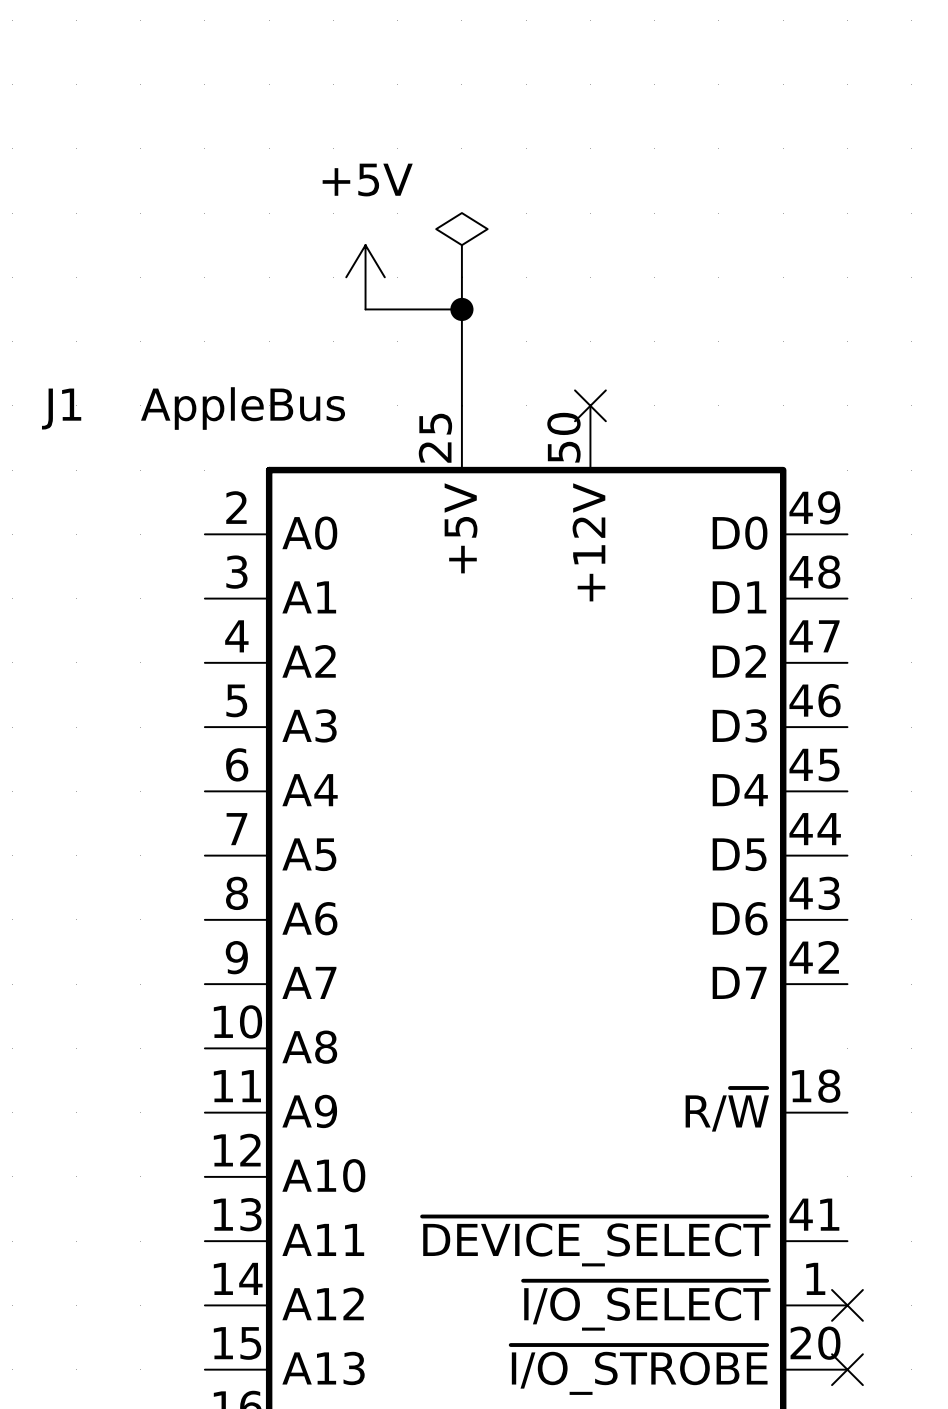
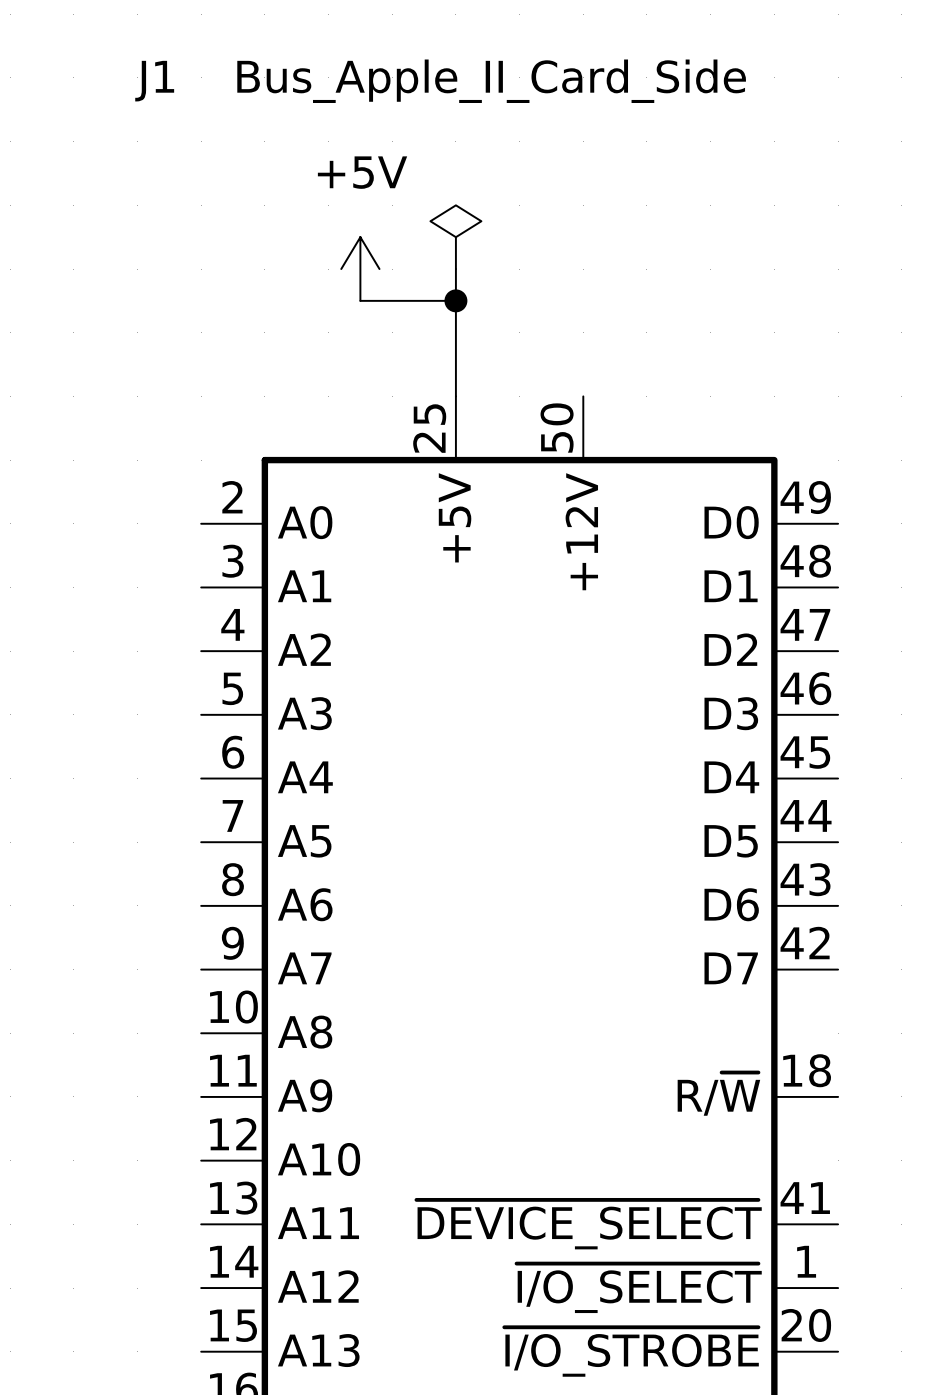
no-connect mark: (590, 405) -> none
J1 value: AppleBus (243, 408) -> Bus_Apple_II_Card_Side (491, 81)
J1 name position: J1 (61, 409) -> J1 (154, 81)
no-connect mark: (847, 1305) -> none
no-connect mark: (847, 1369) -> none

